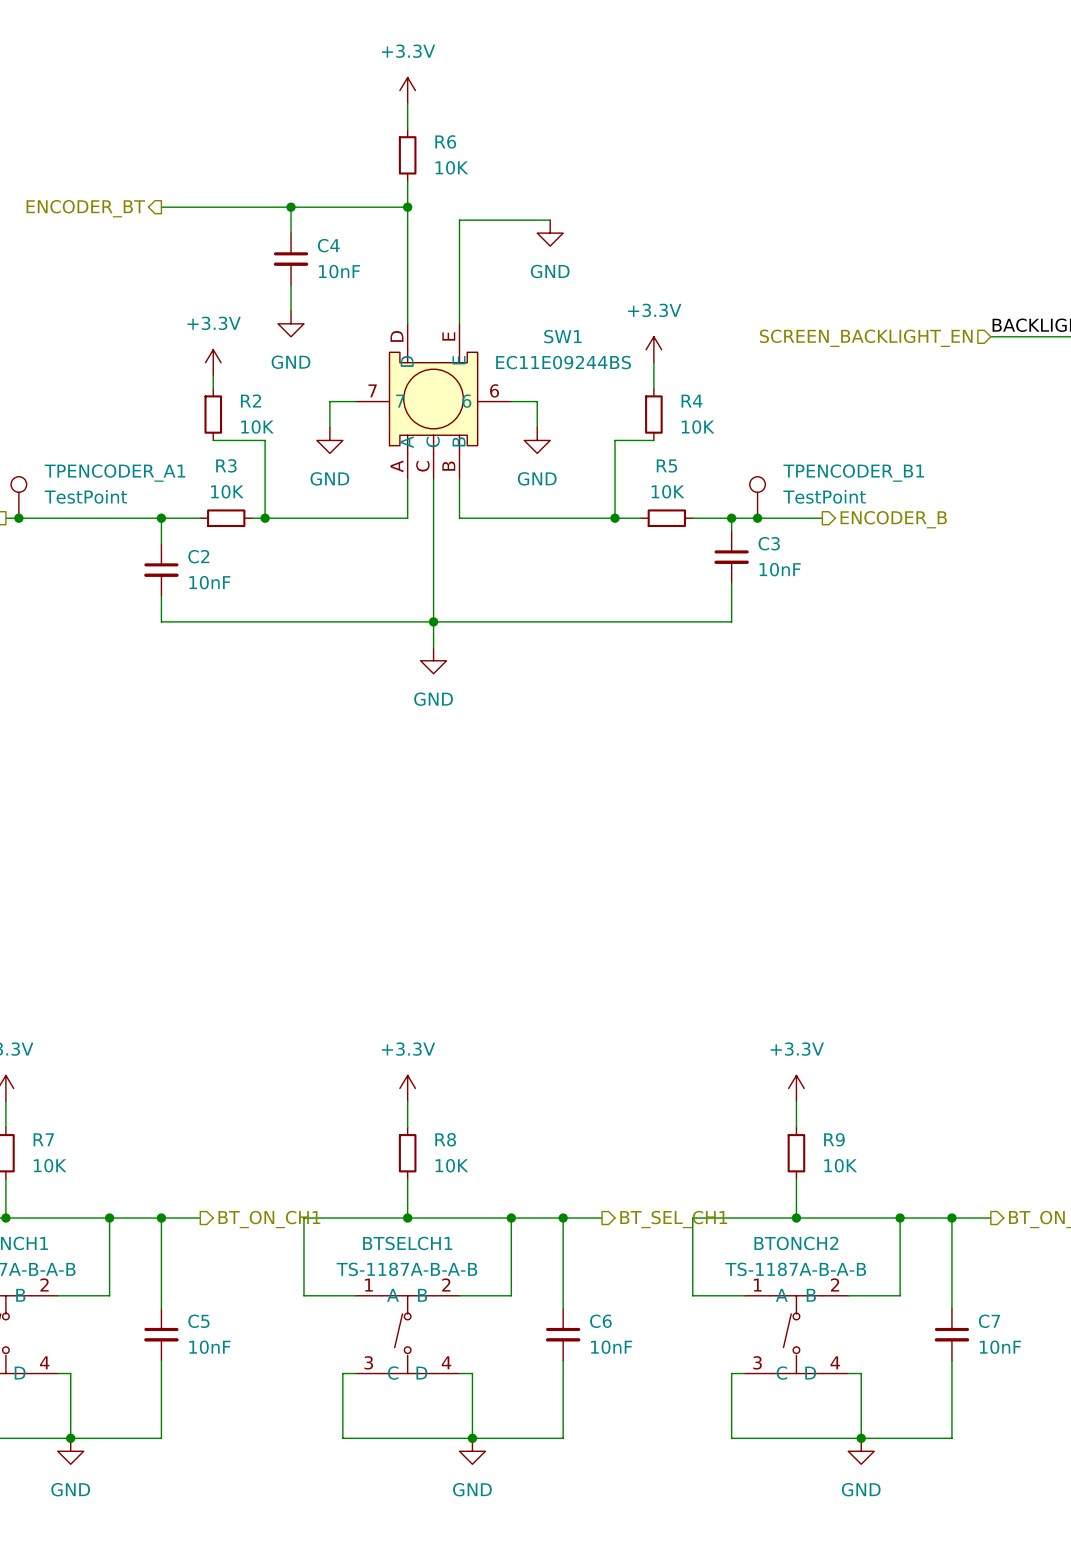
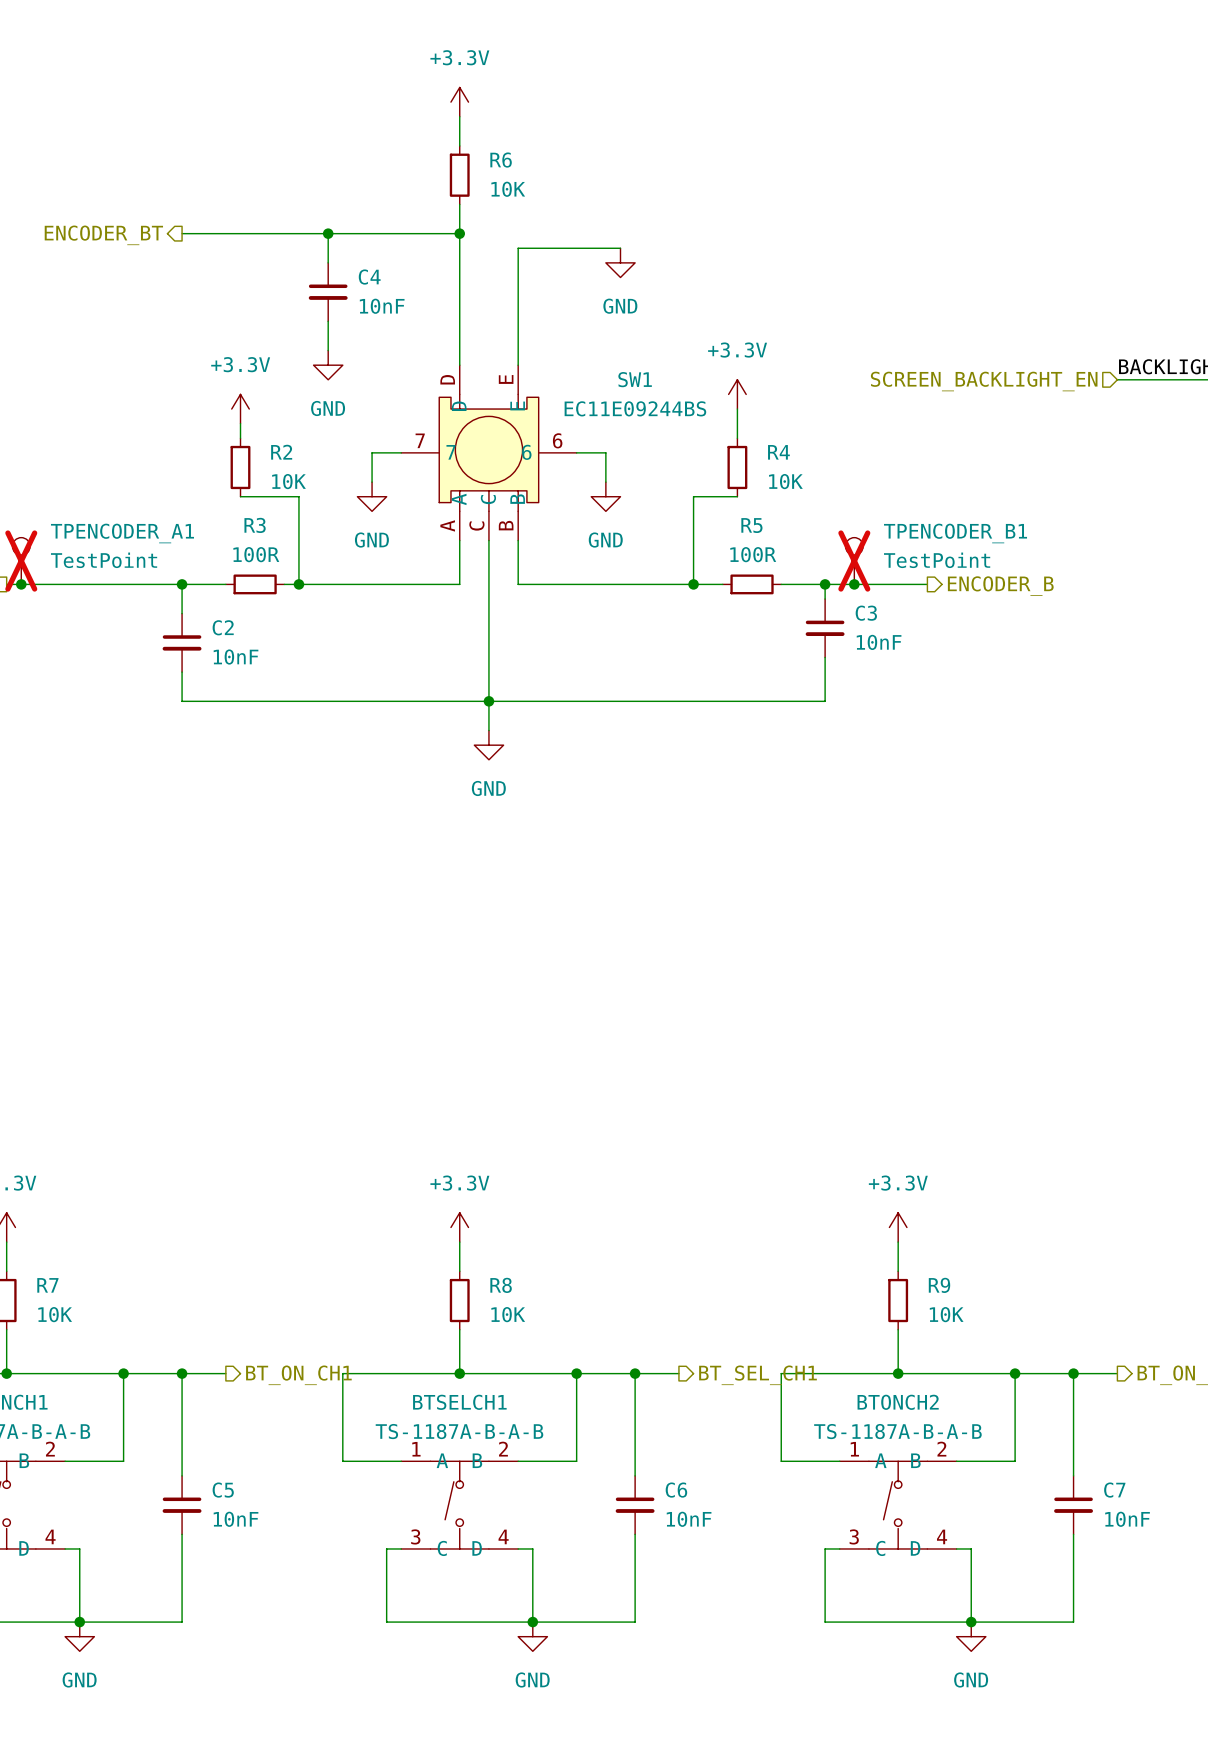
R3 value: 10K (227, 491) -> 100R (256, 554)
R5 value: 10K (668, 491) -> 100R (753, 554)
TPENCODER_A1 do-not-place cross: none -> (21, 561)
TPENCODER_B1 do-not-place cross: none -> (854, 561)

